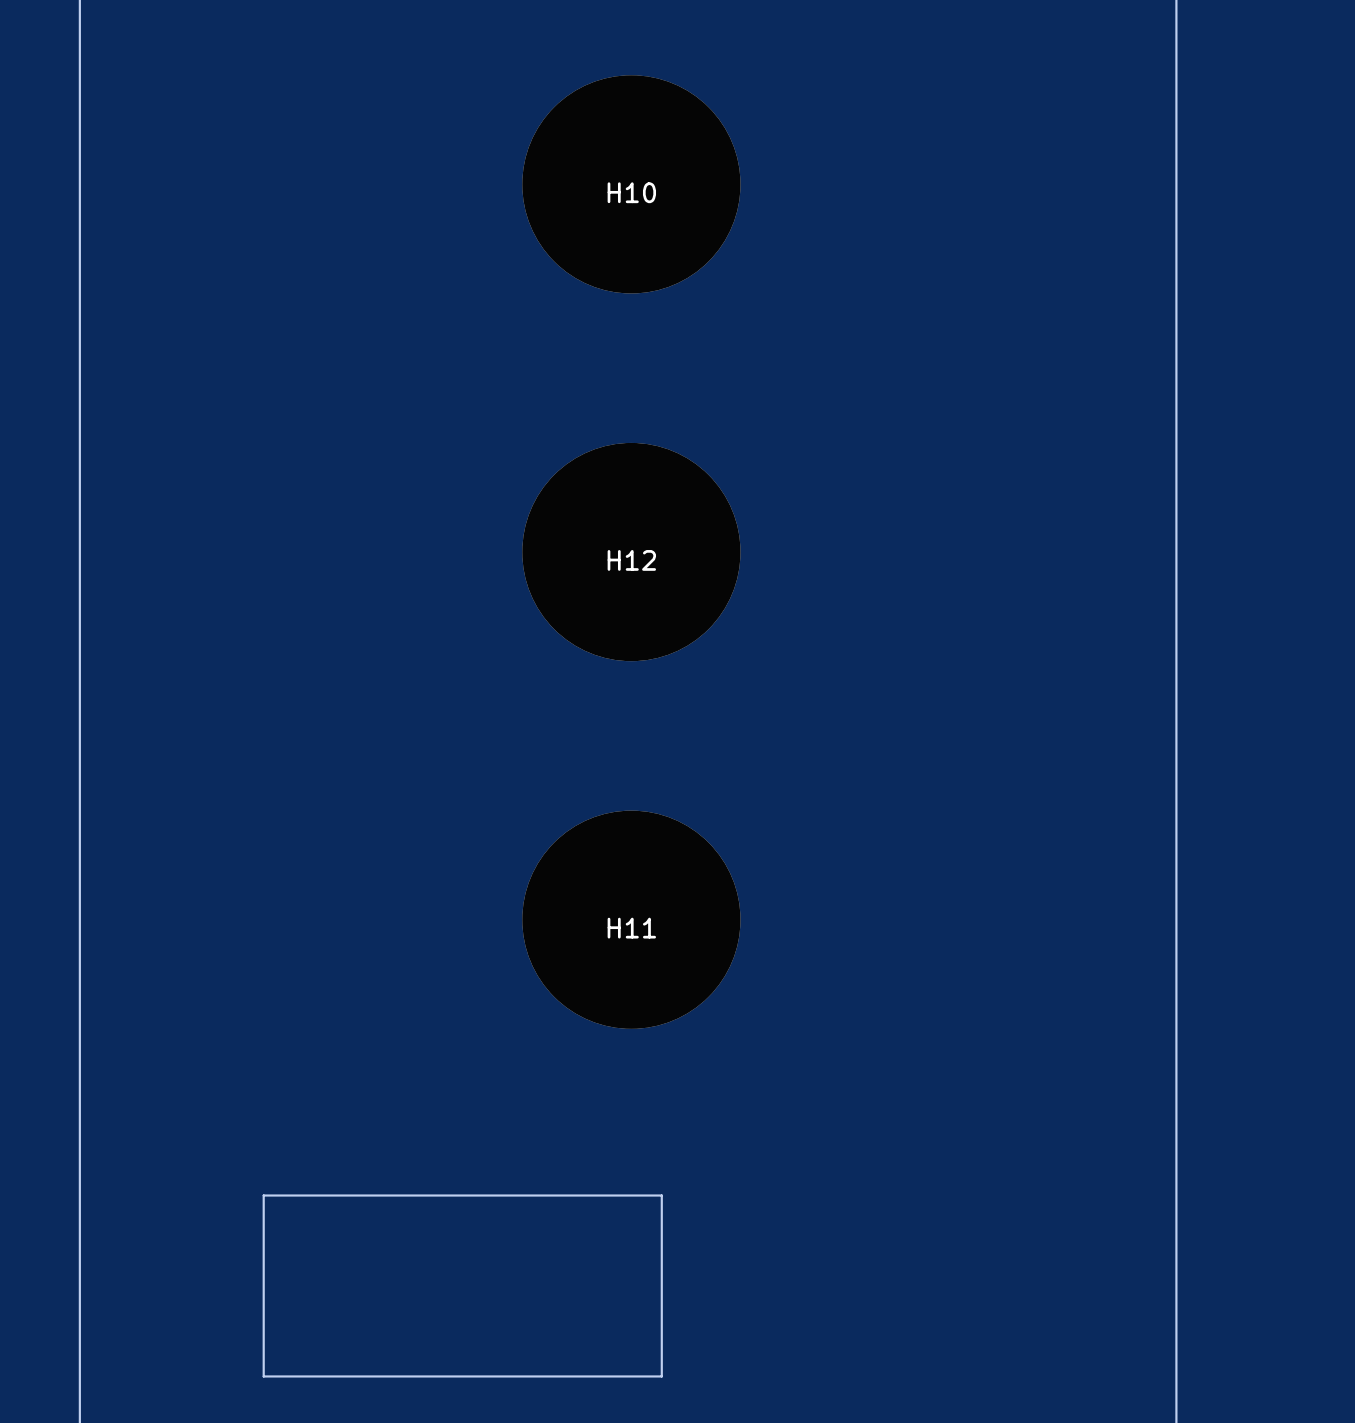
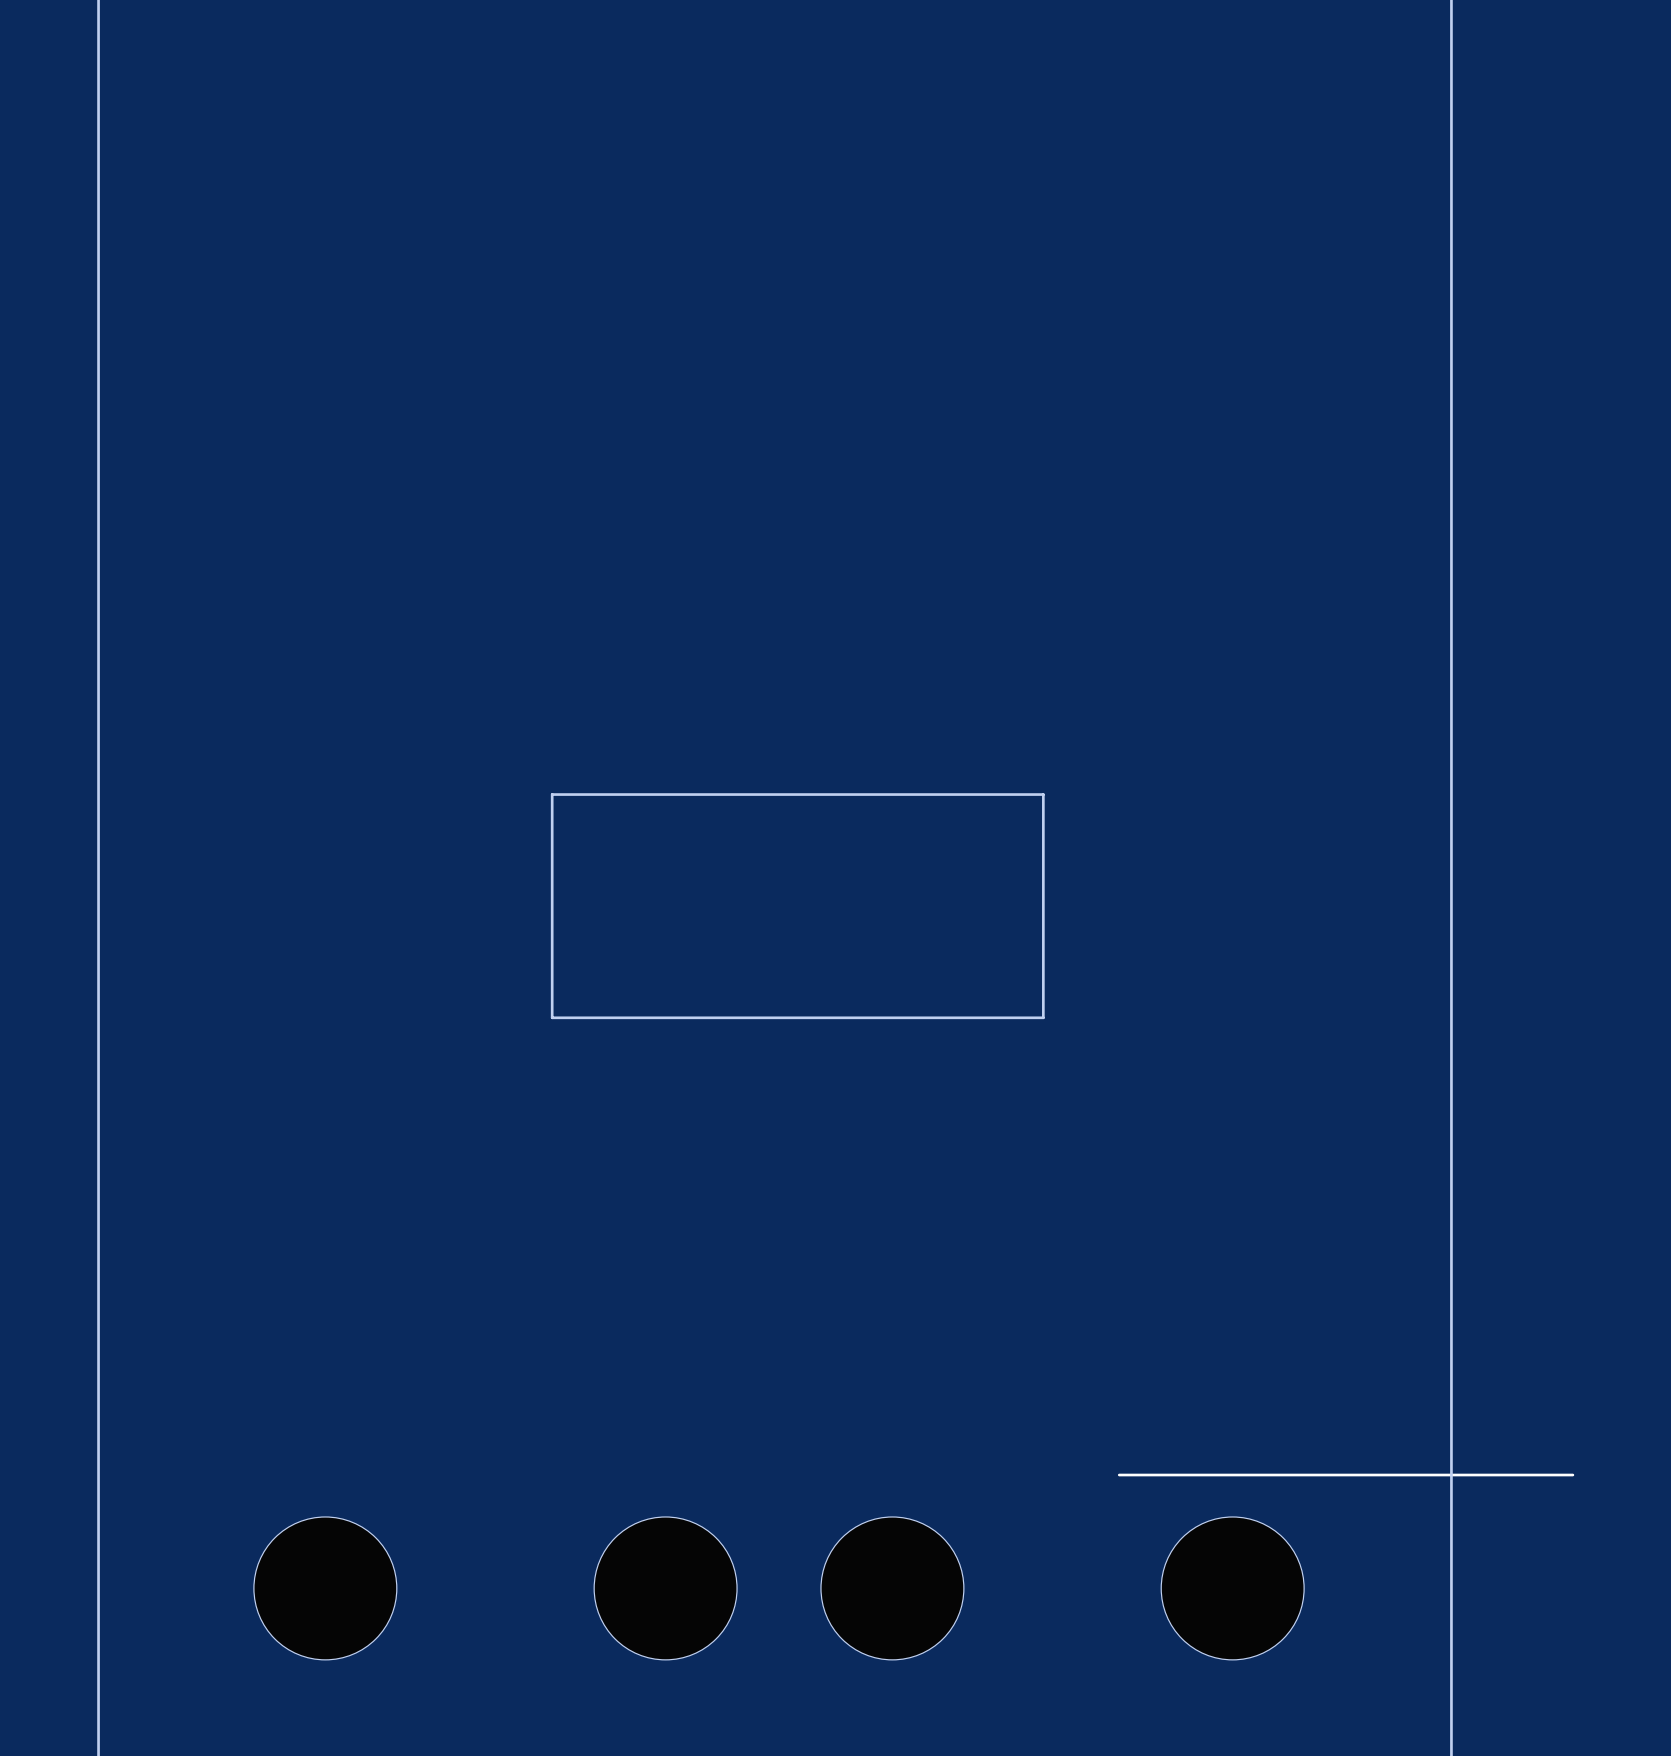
H10: (631, 184) -> none
H12: (631, 552) -> none
board edge: none -> (552, 794) (552, 1017) (1043, 1017) (1043, 794) (552, 794)
H11: (631, 919) -> none
board edge: (263, 1195) (263, 1376) (661, 1376) (661, 1195) (263, 1195) -> none
line: none -> (1119, 1475) (1572, 1475)
part: none -> (325, 1588)
part: none -> (665, 1588)
part: none -> (892, 1588)
part: none -> (1232, 1588)

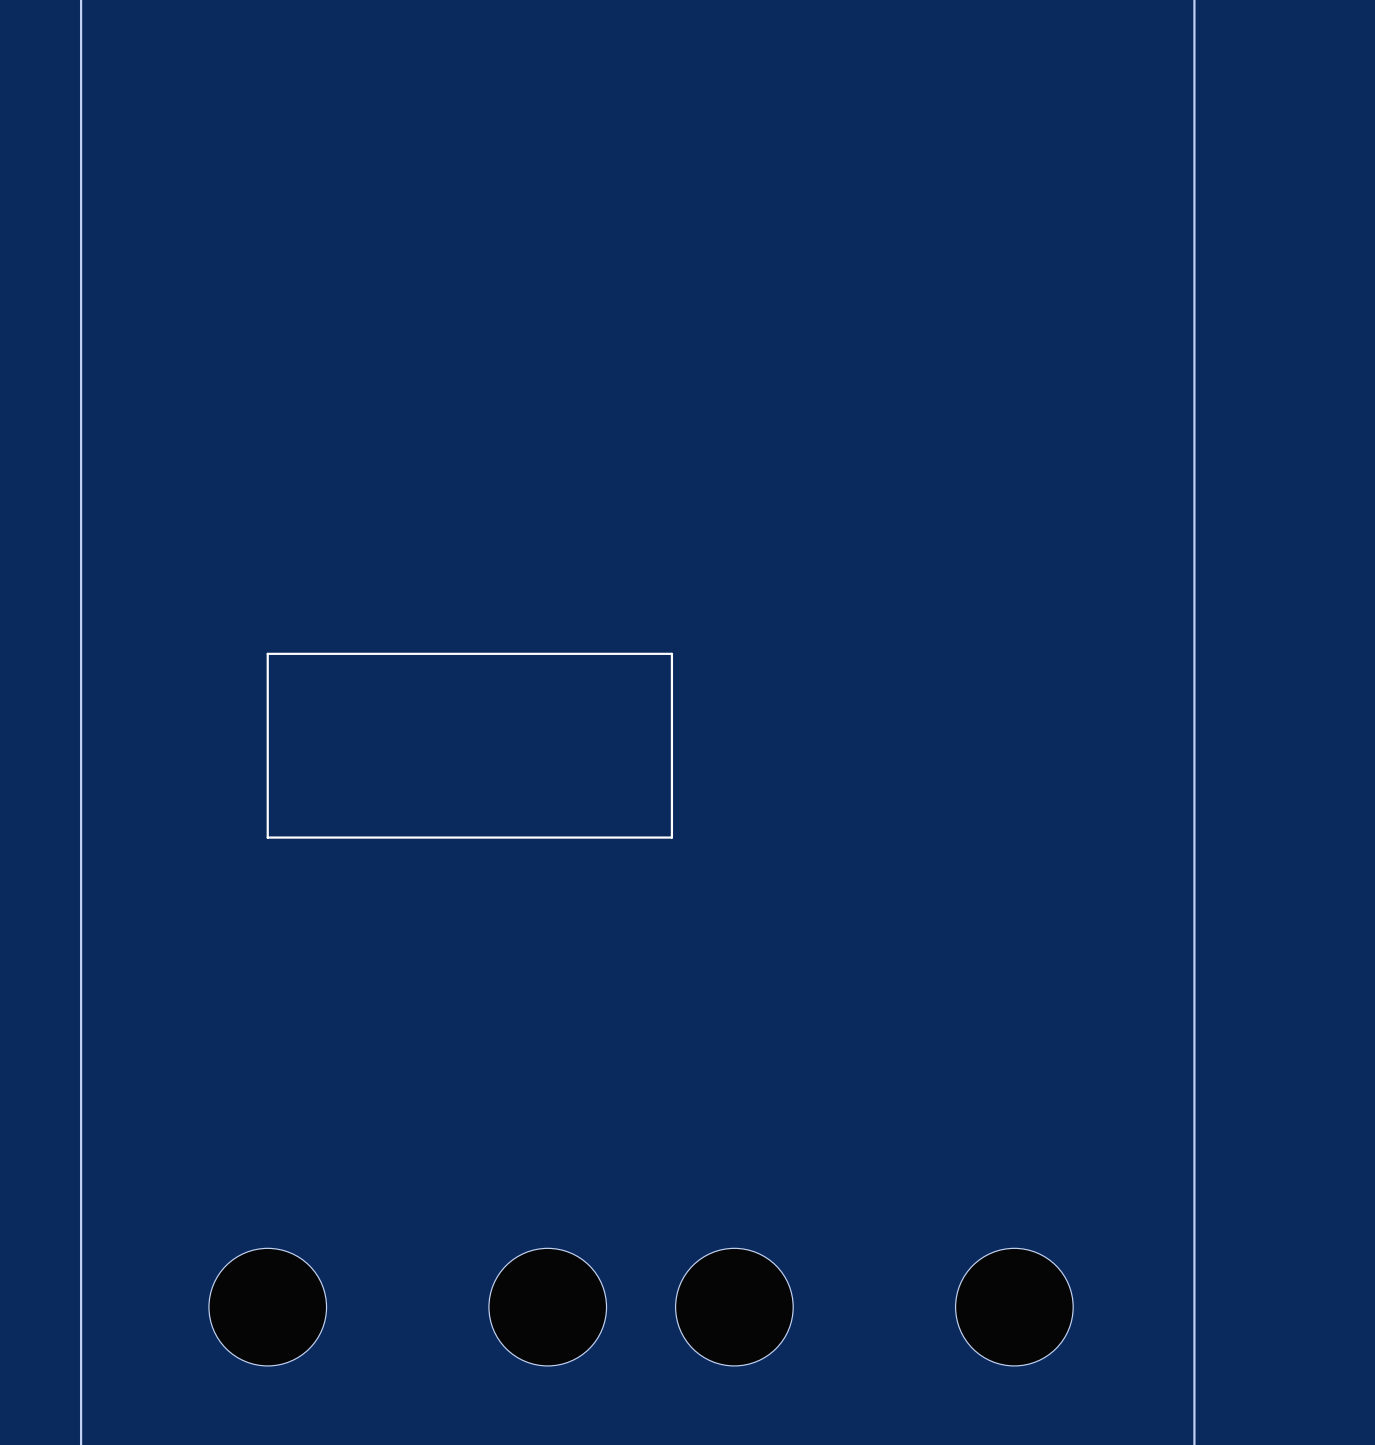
line: none -> (267, 653) (267, 837) (671, 837) (671, 653) (267, 653)
board edge: (552, 794) (552, 1017) (1043, 1017) (1043, 794) (552, 794) -> none
line: (1119, 1475) (1572, 1475) -> none

